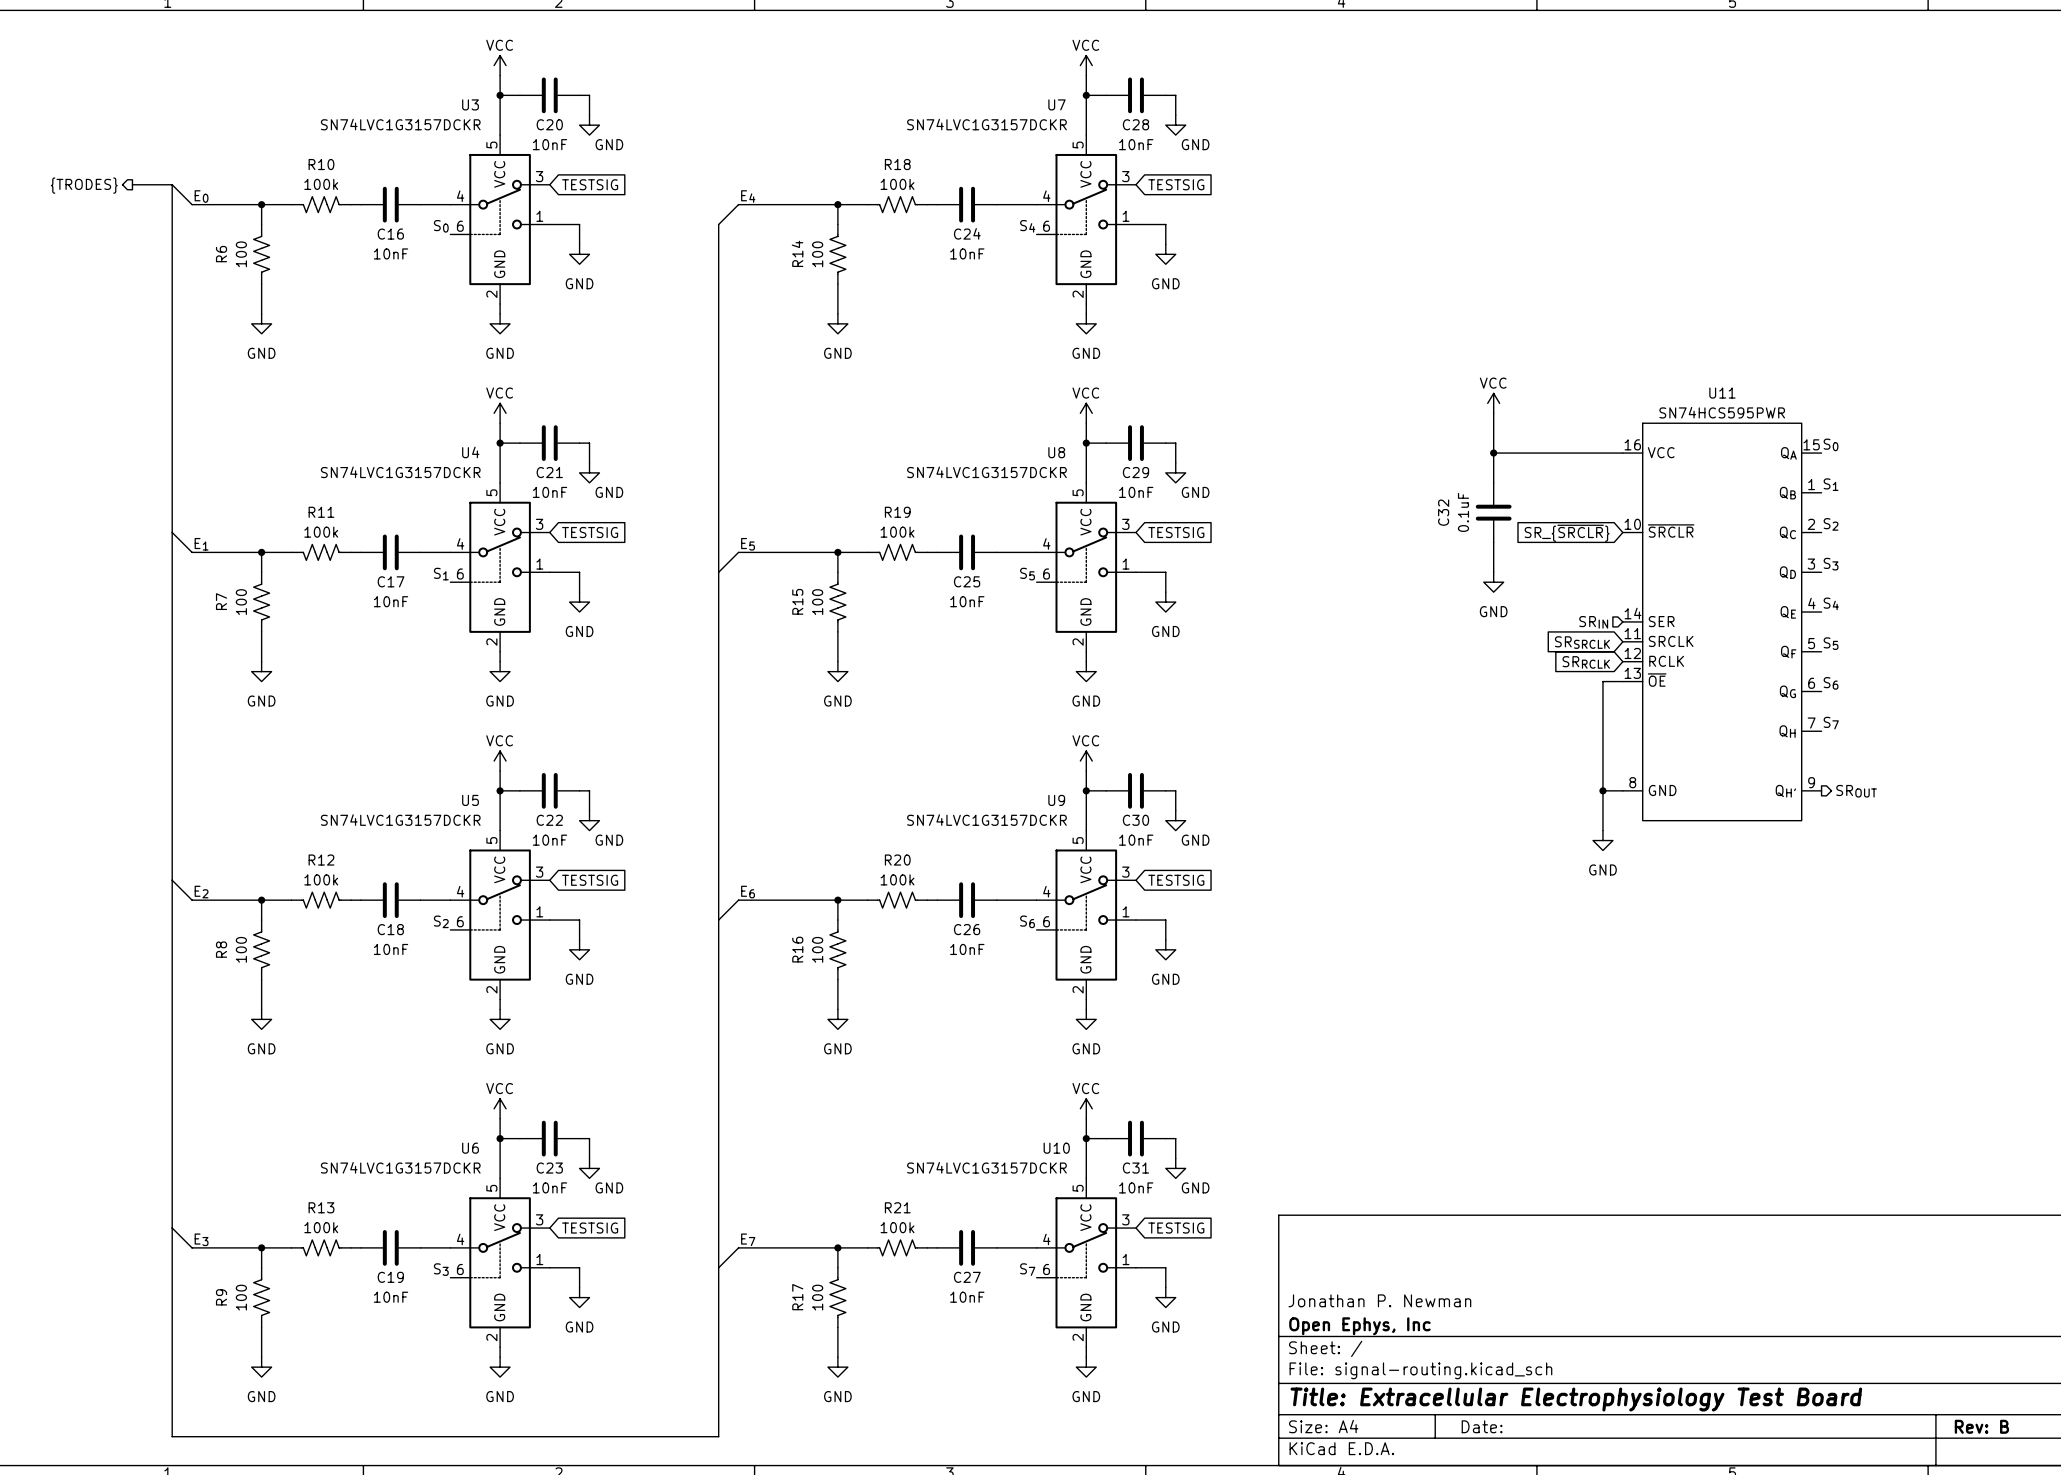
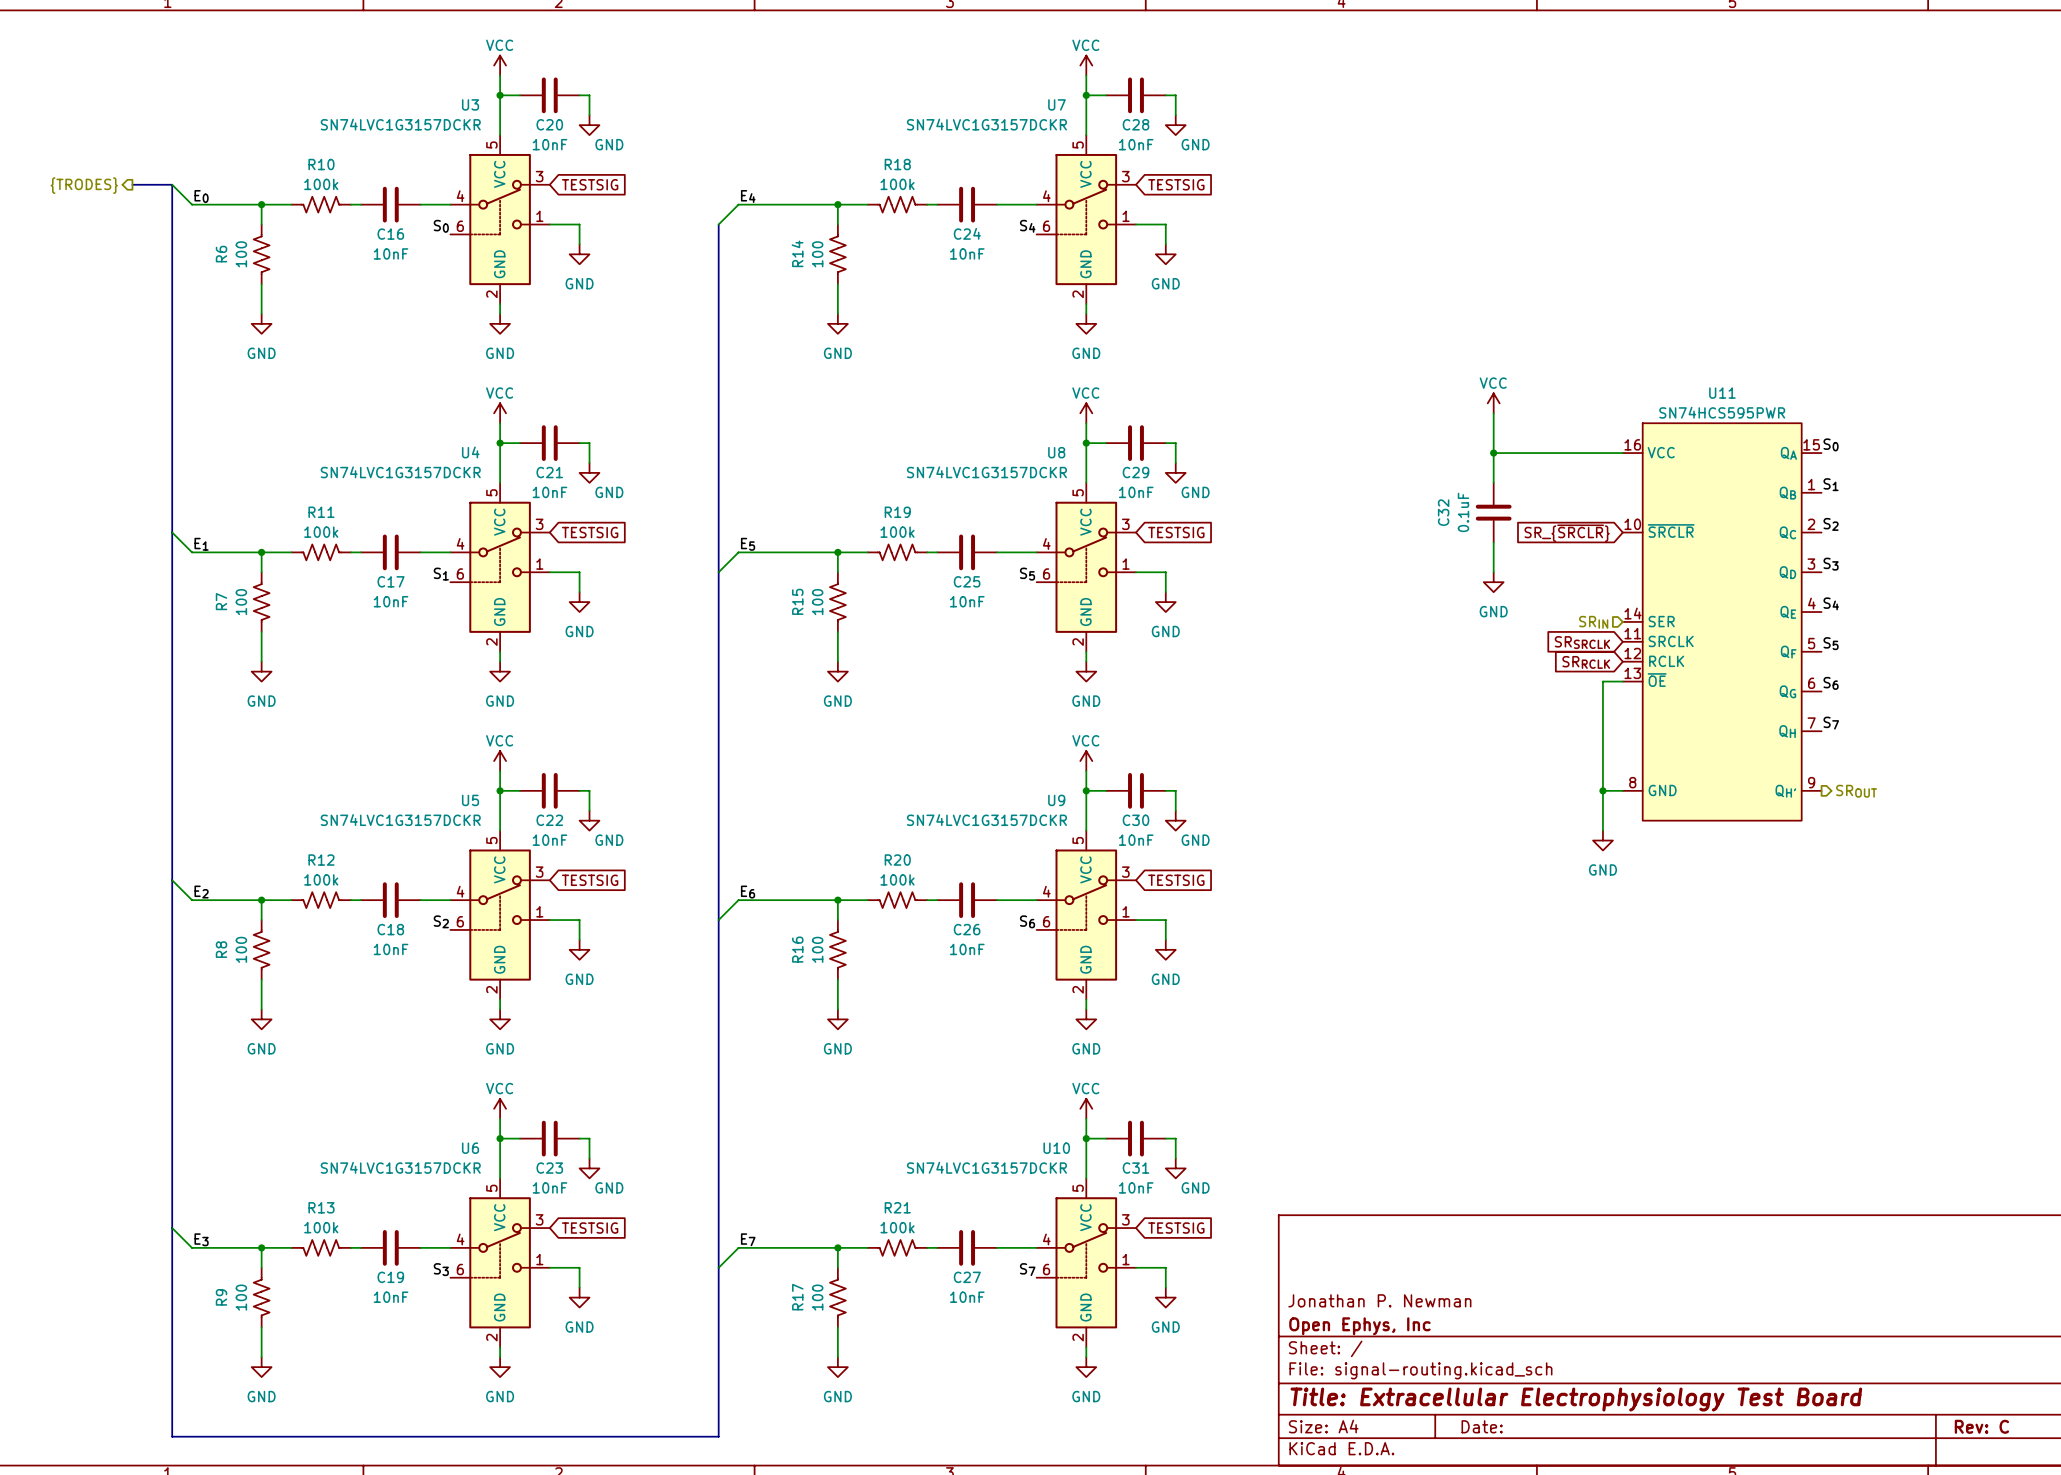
title block: Rev: B (1981, 1426) -> Rev: C (1981, 1426)

